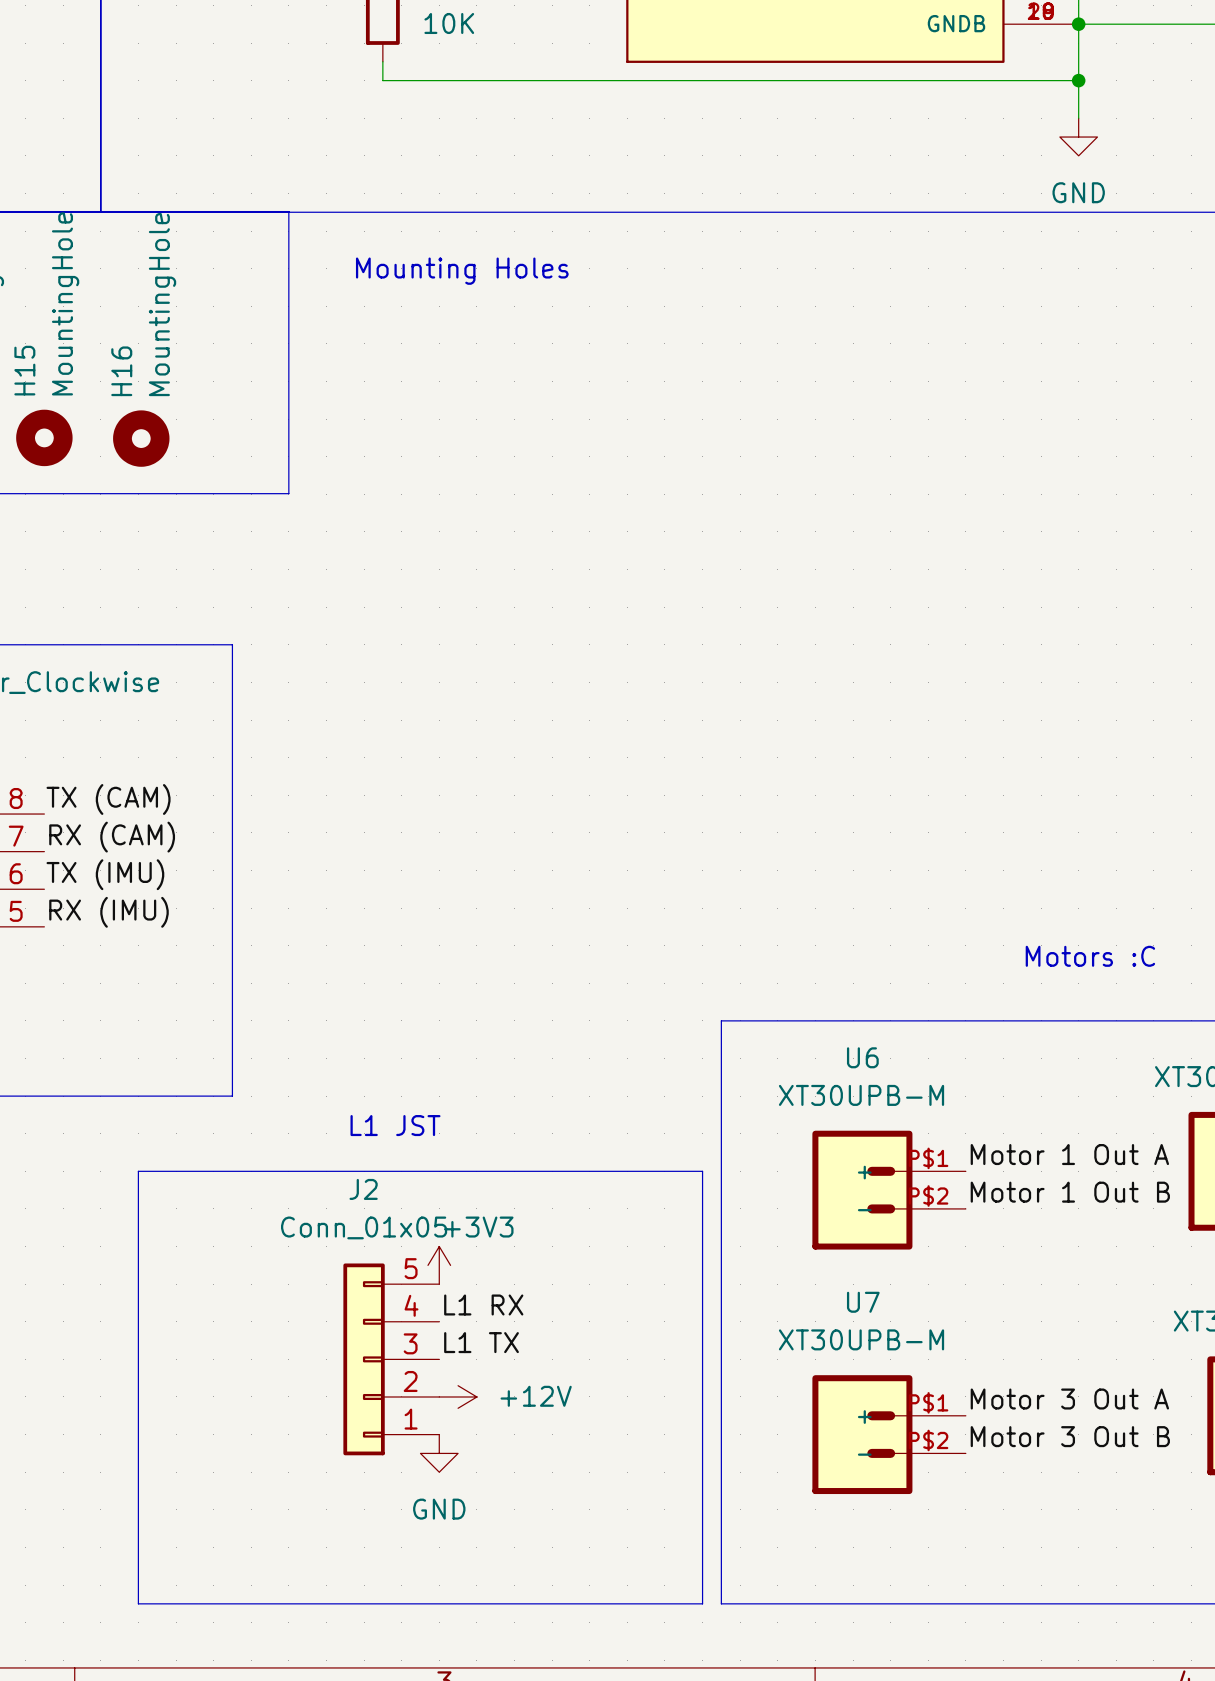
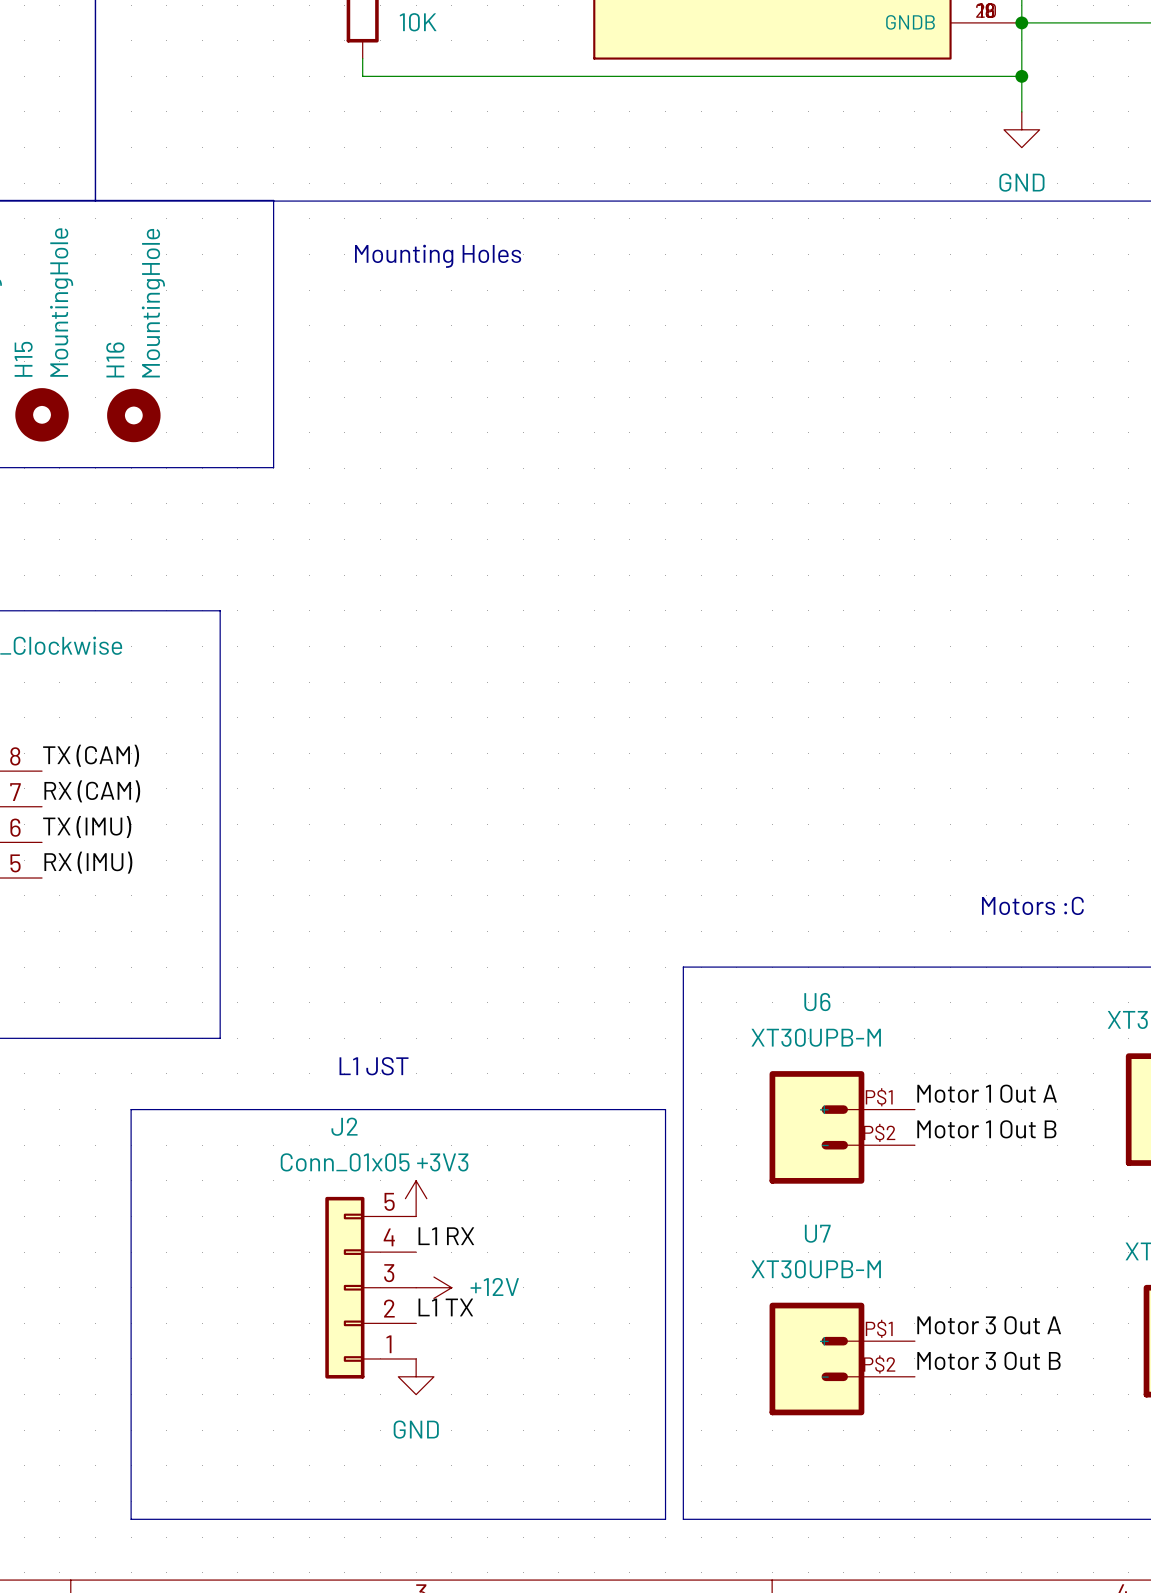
label position: L1 TX (481, 1342) -> L1 TX (445, 1307)
power symbol position: +12V (458, 1396) -> +12V (433, 1287)

